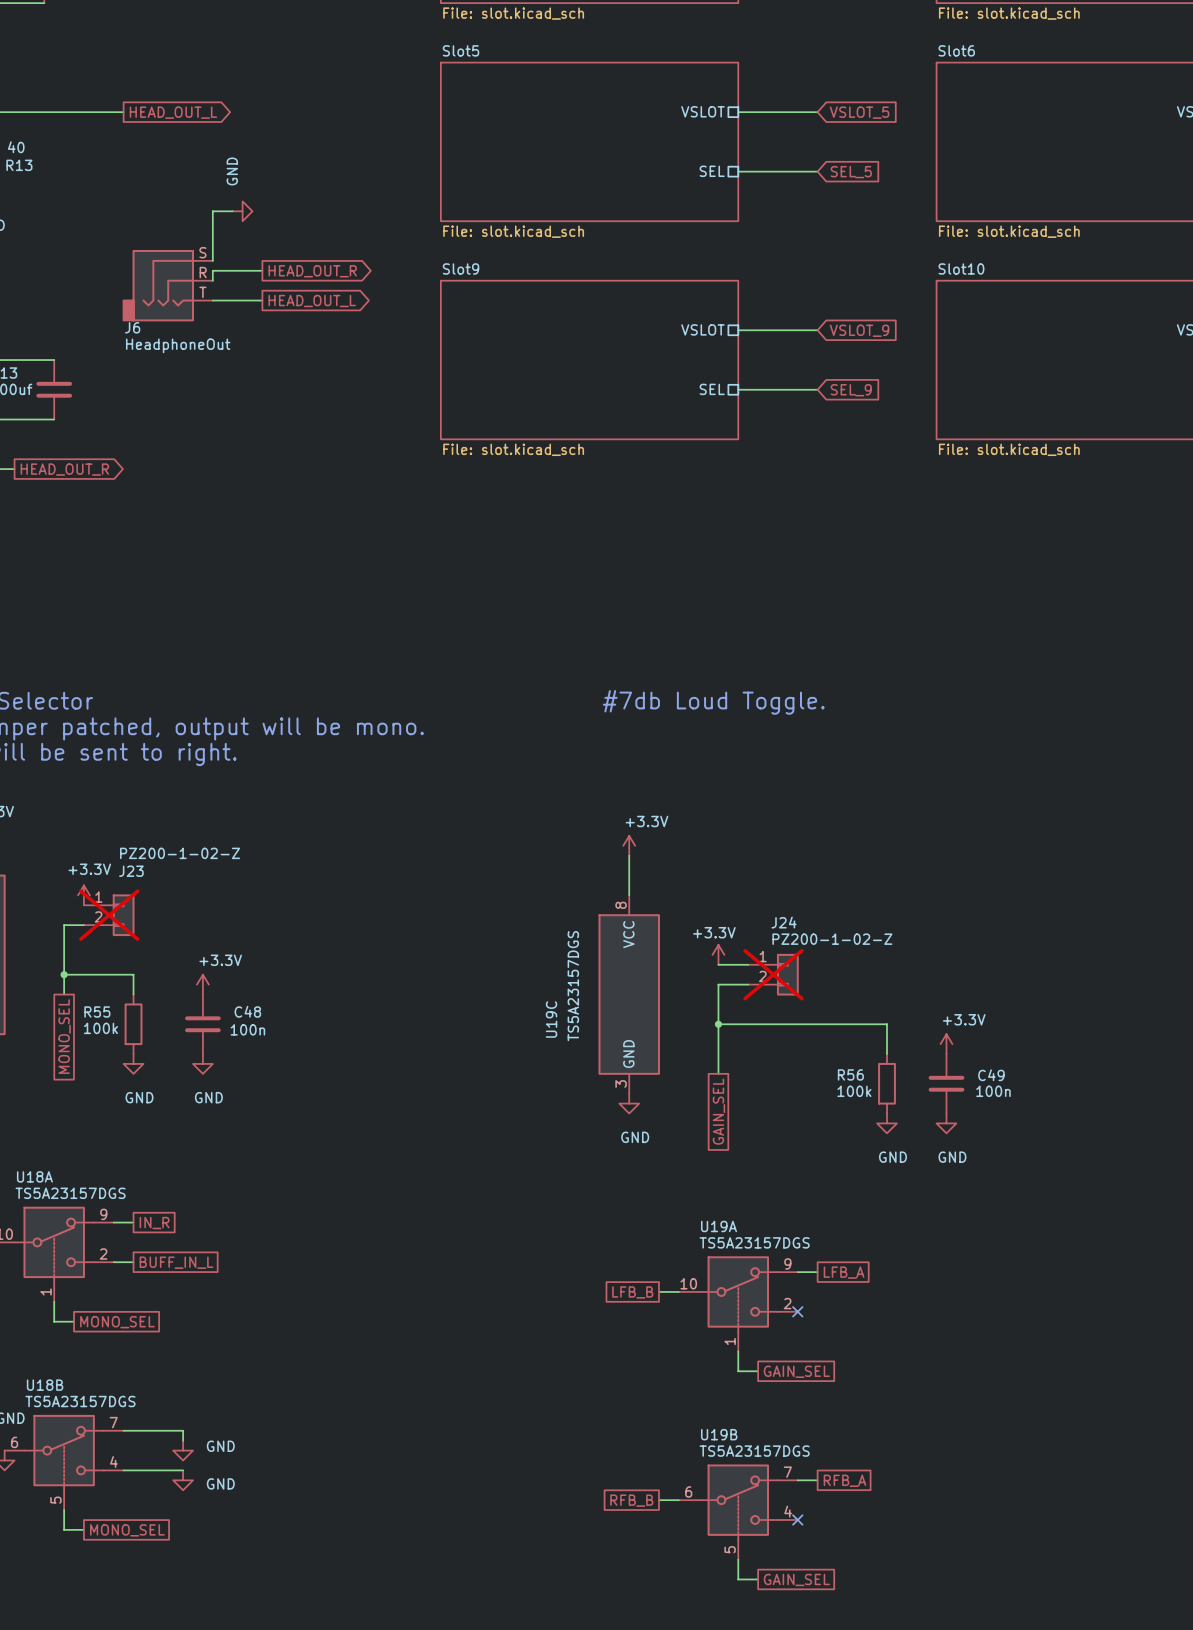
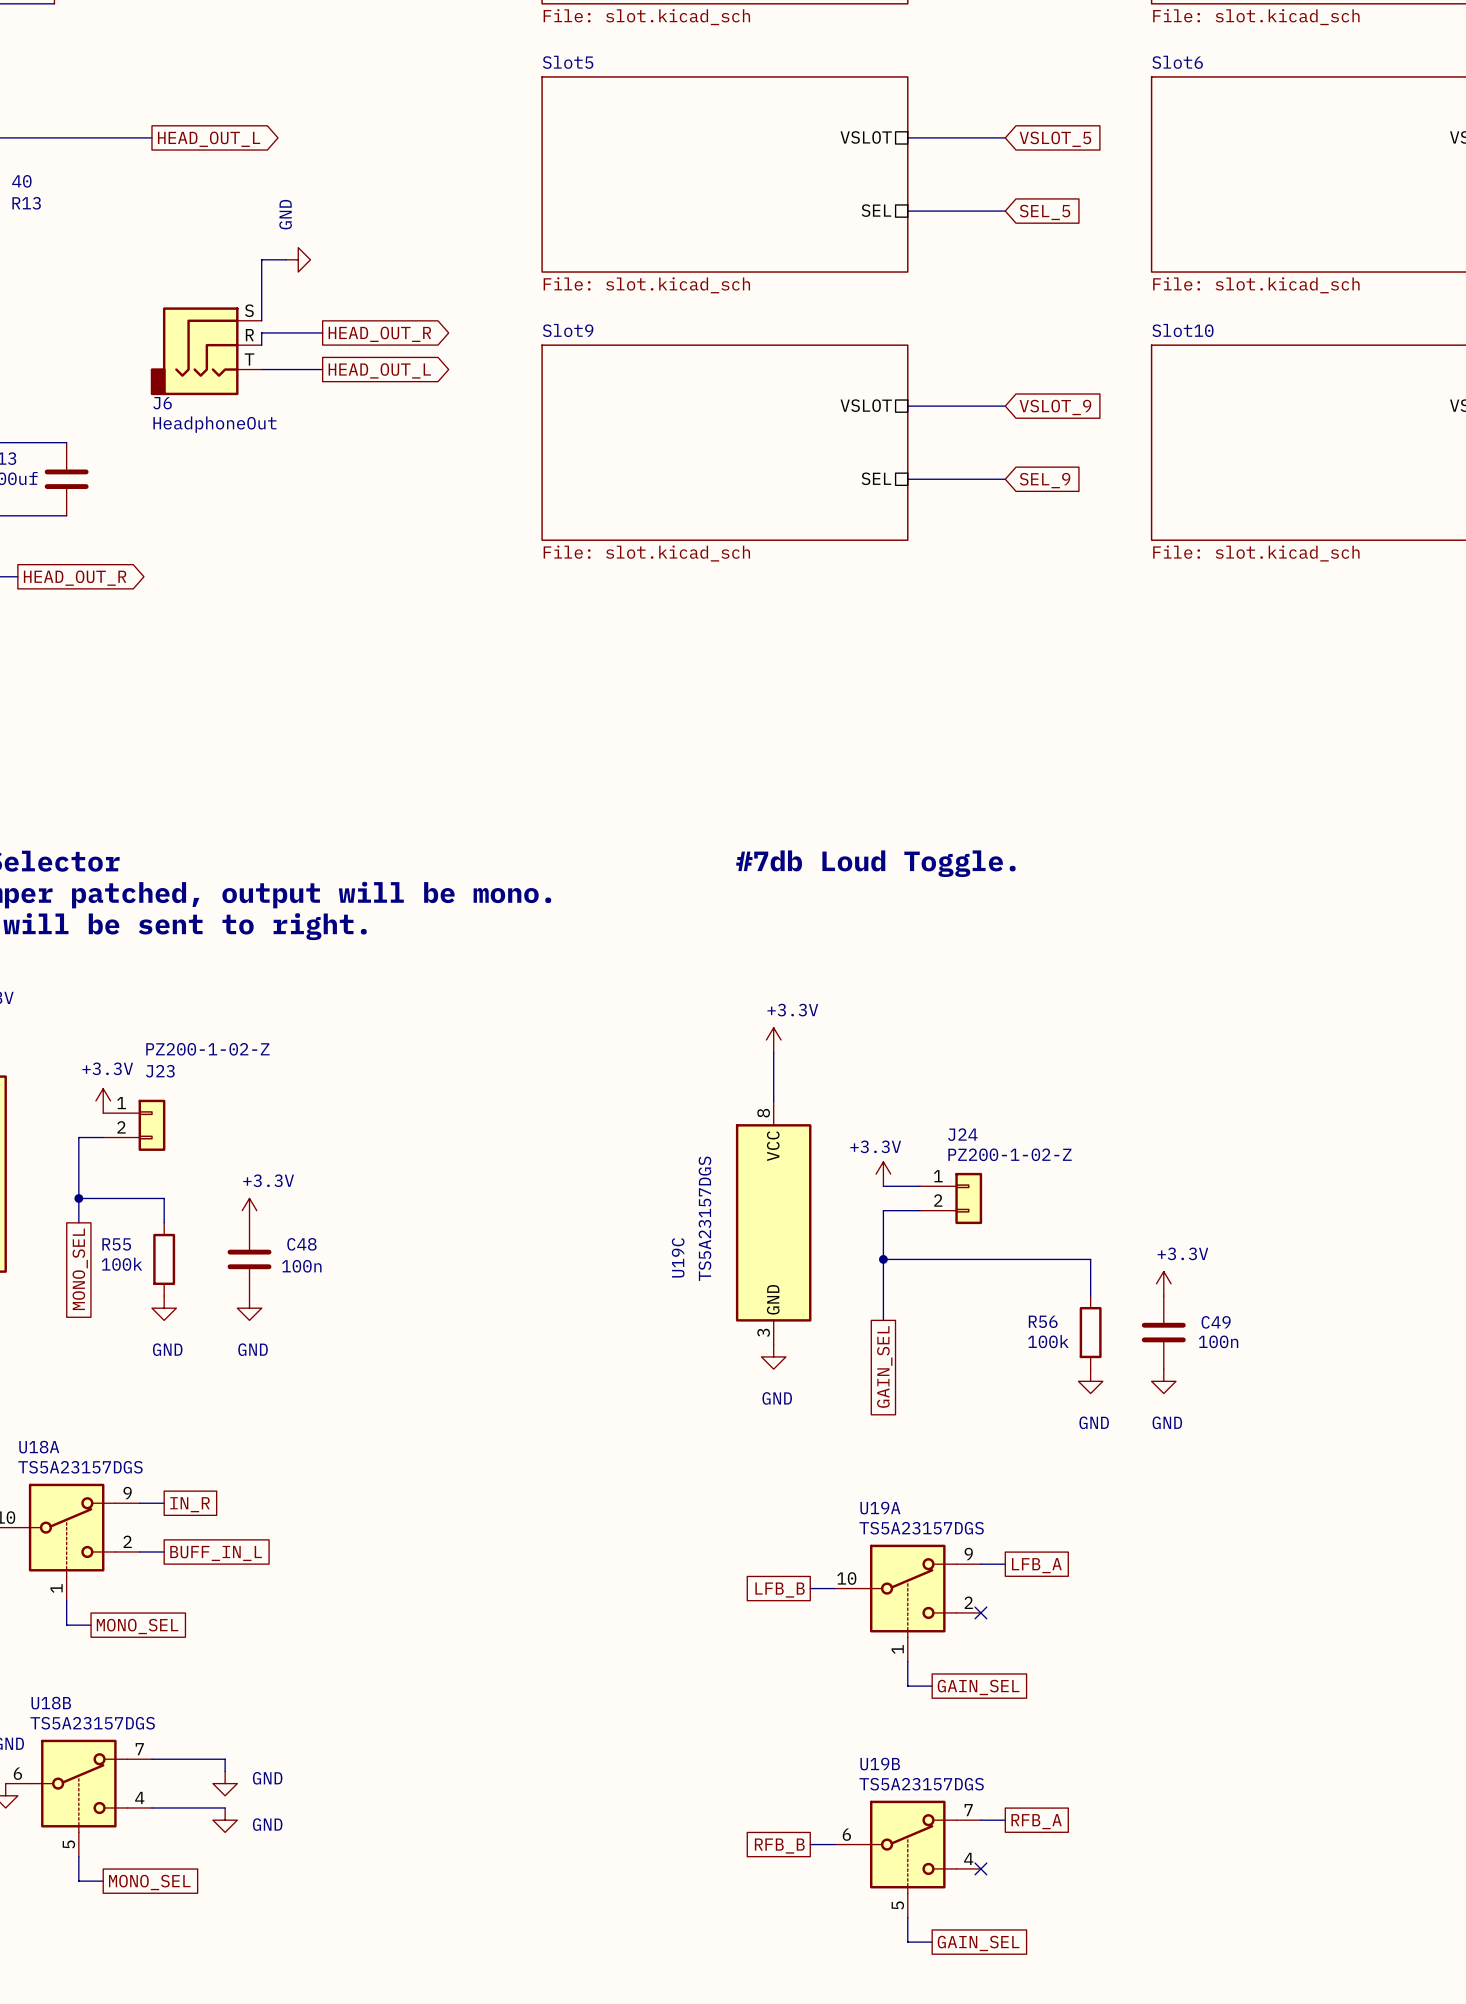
J23 do-not-place cross: (109, 915) -> none
J24 do-not-place cross: (773, 974) -> none

